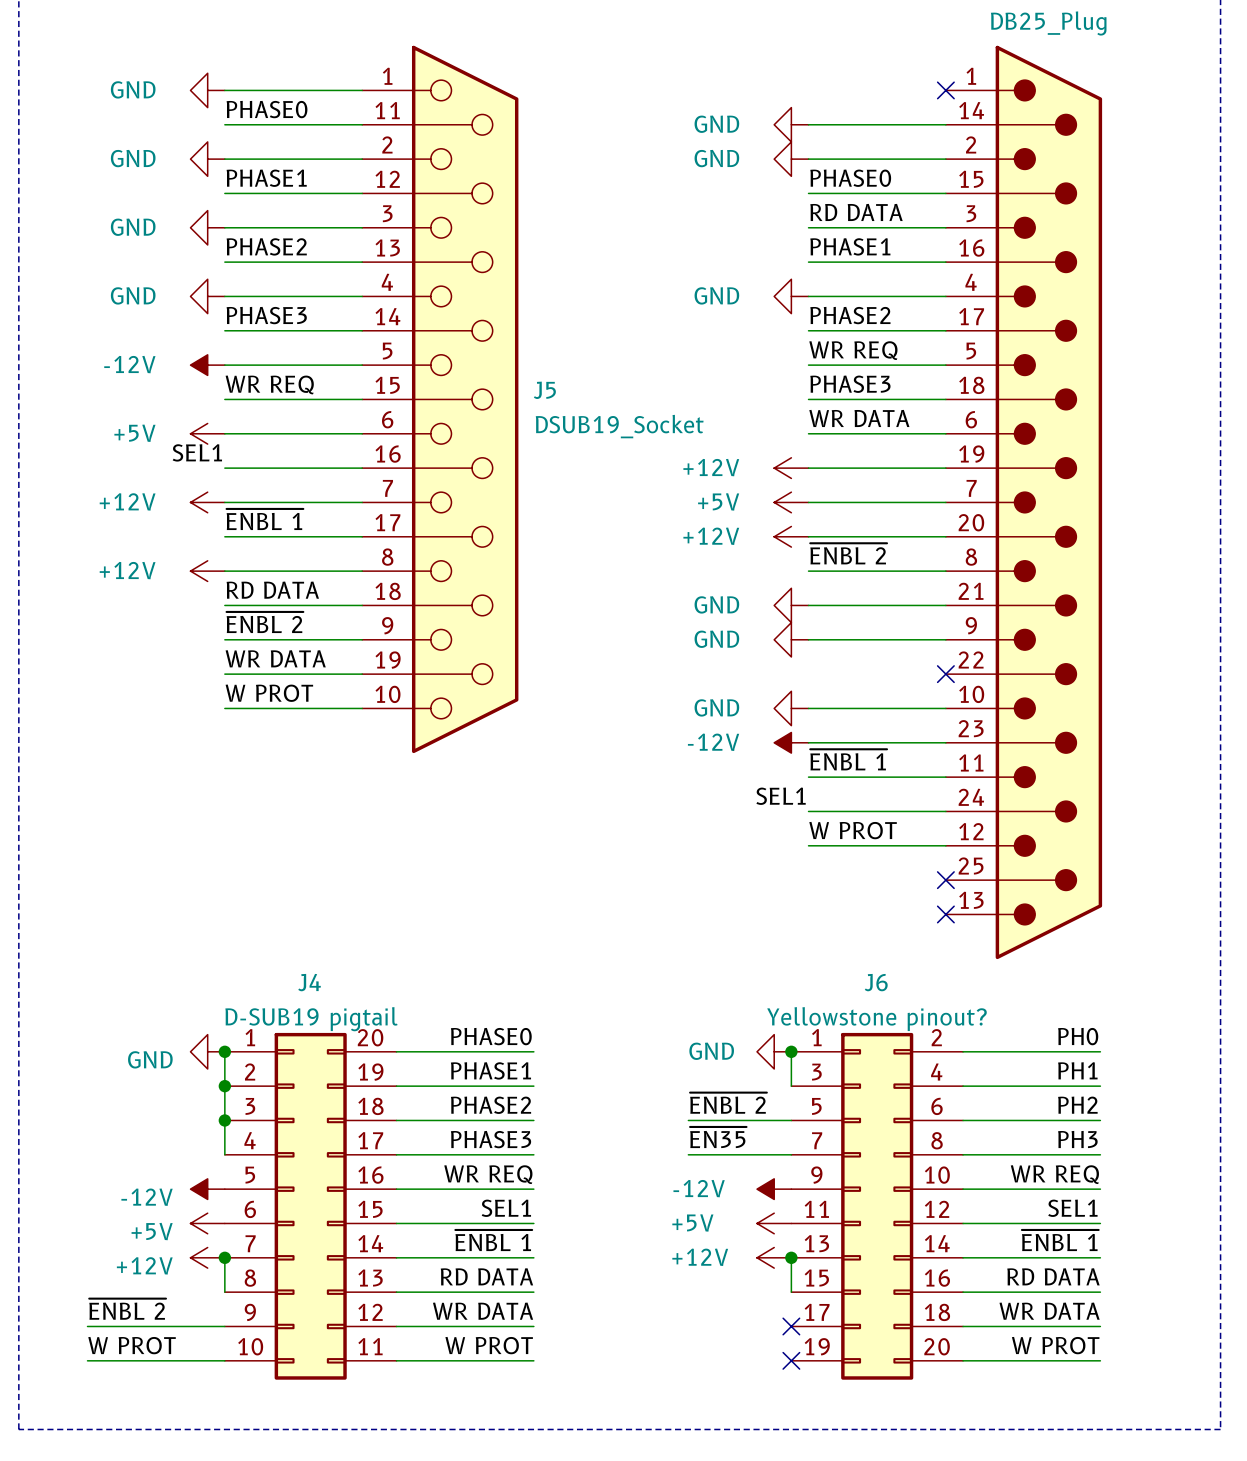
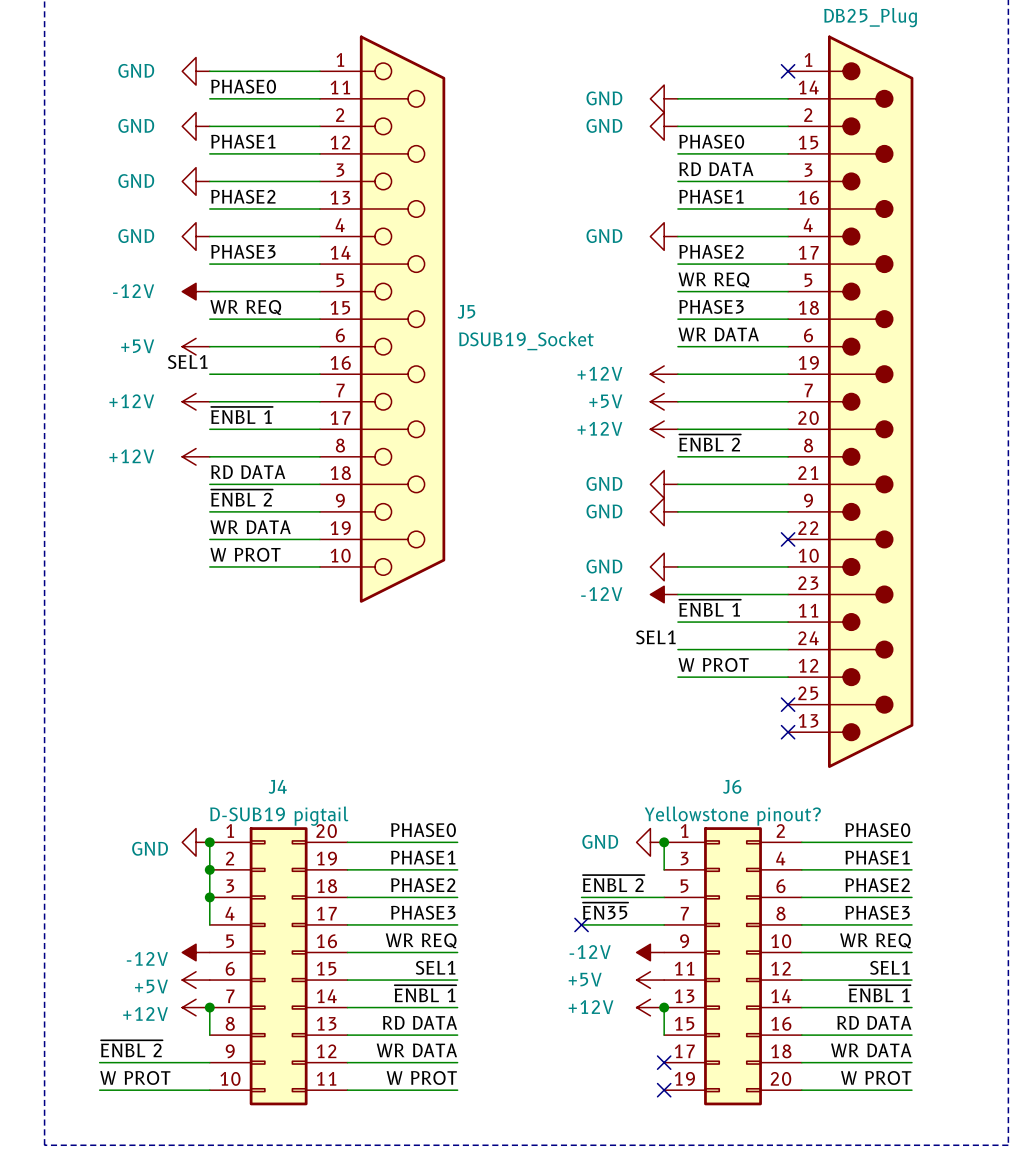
label: PH0 (1078, 1036) -> PHASE0 (877, 830)
label: PH1 (1077, 1070) -> PHASE1 (877, 857)
label: PH2 (1077, 1105) -> PHASE2 (877, 885)
label: PH3 (1077, 1139) -> PHASE3 (877, 912)
no-connect mark: none -> (581, 924)

